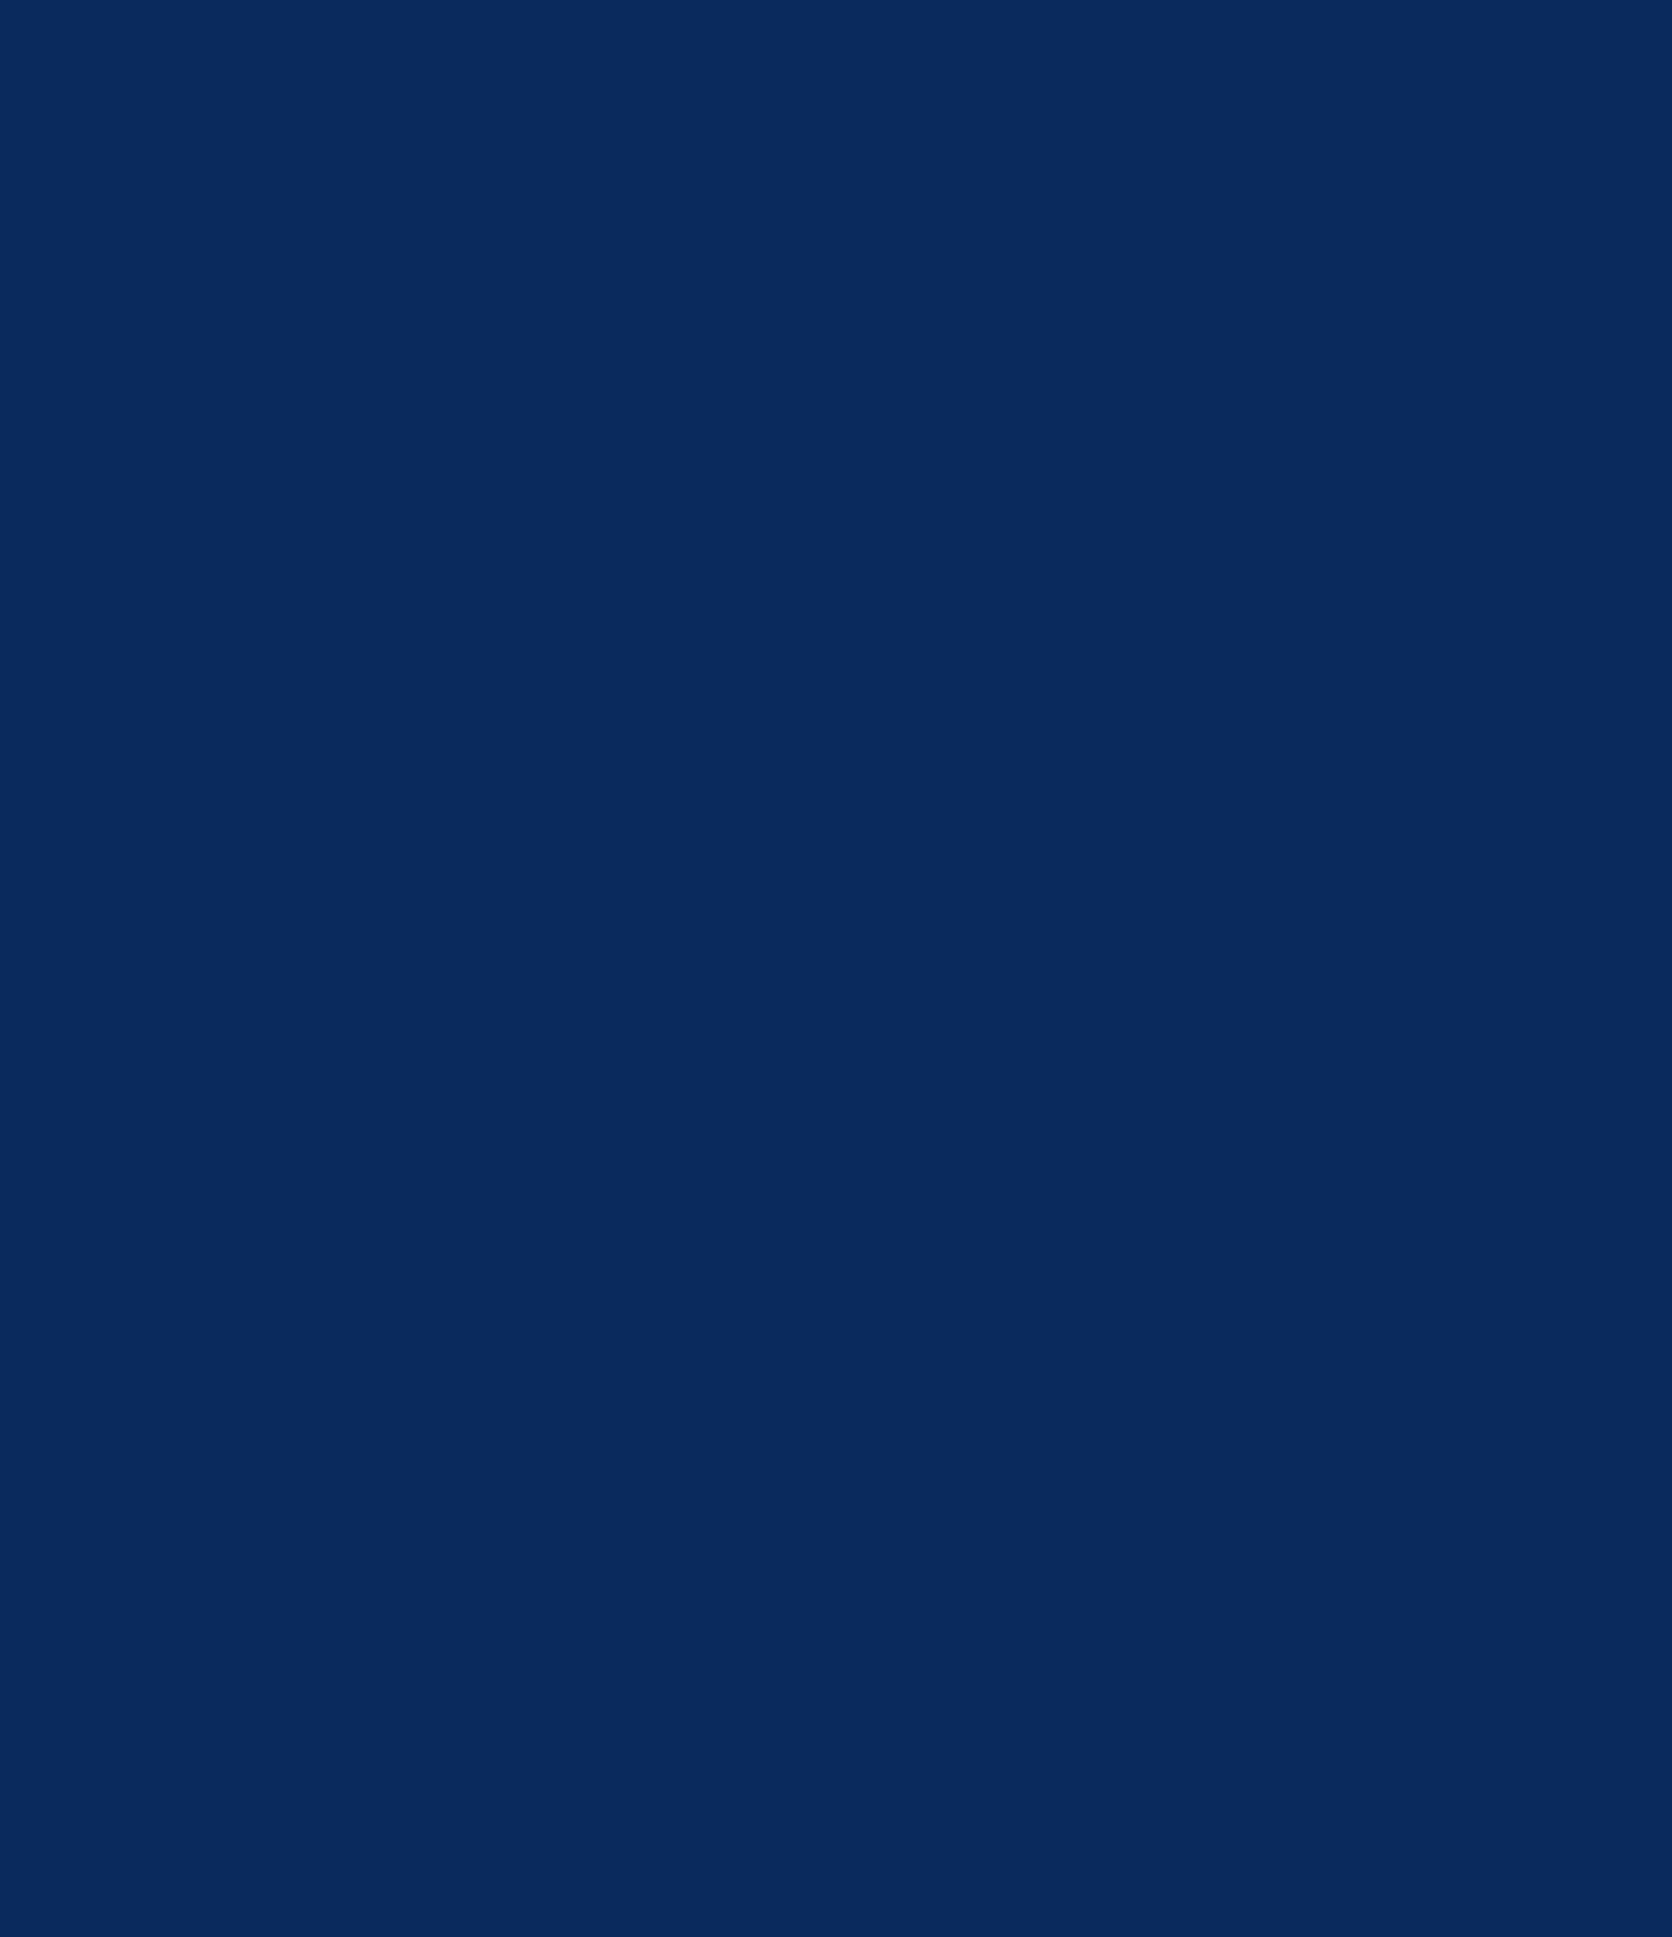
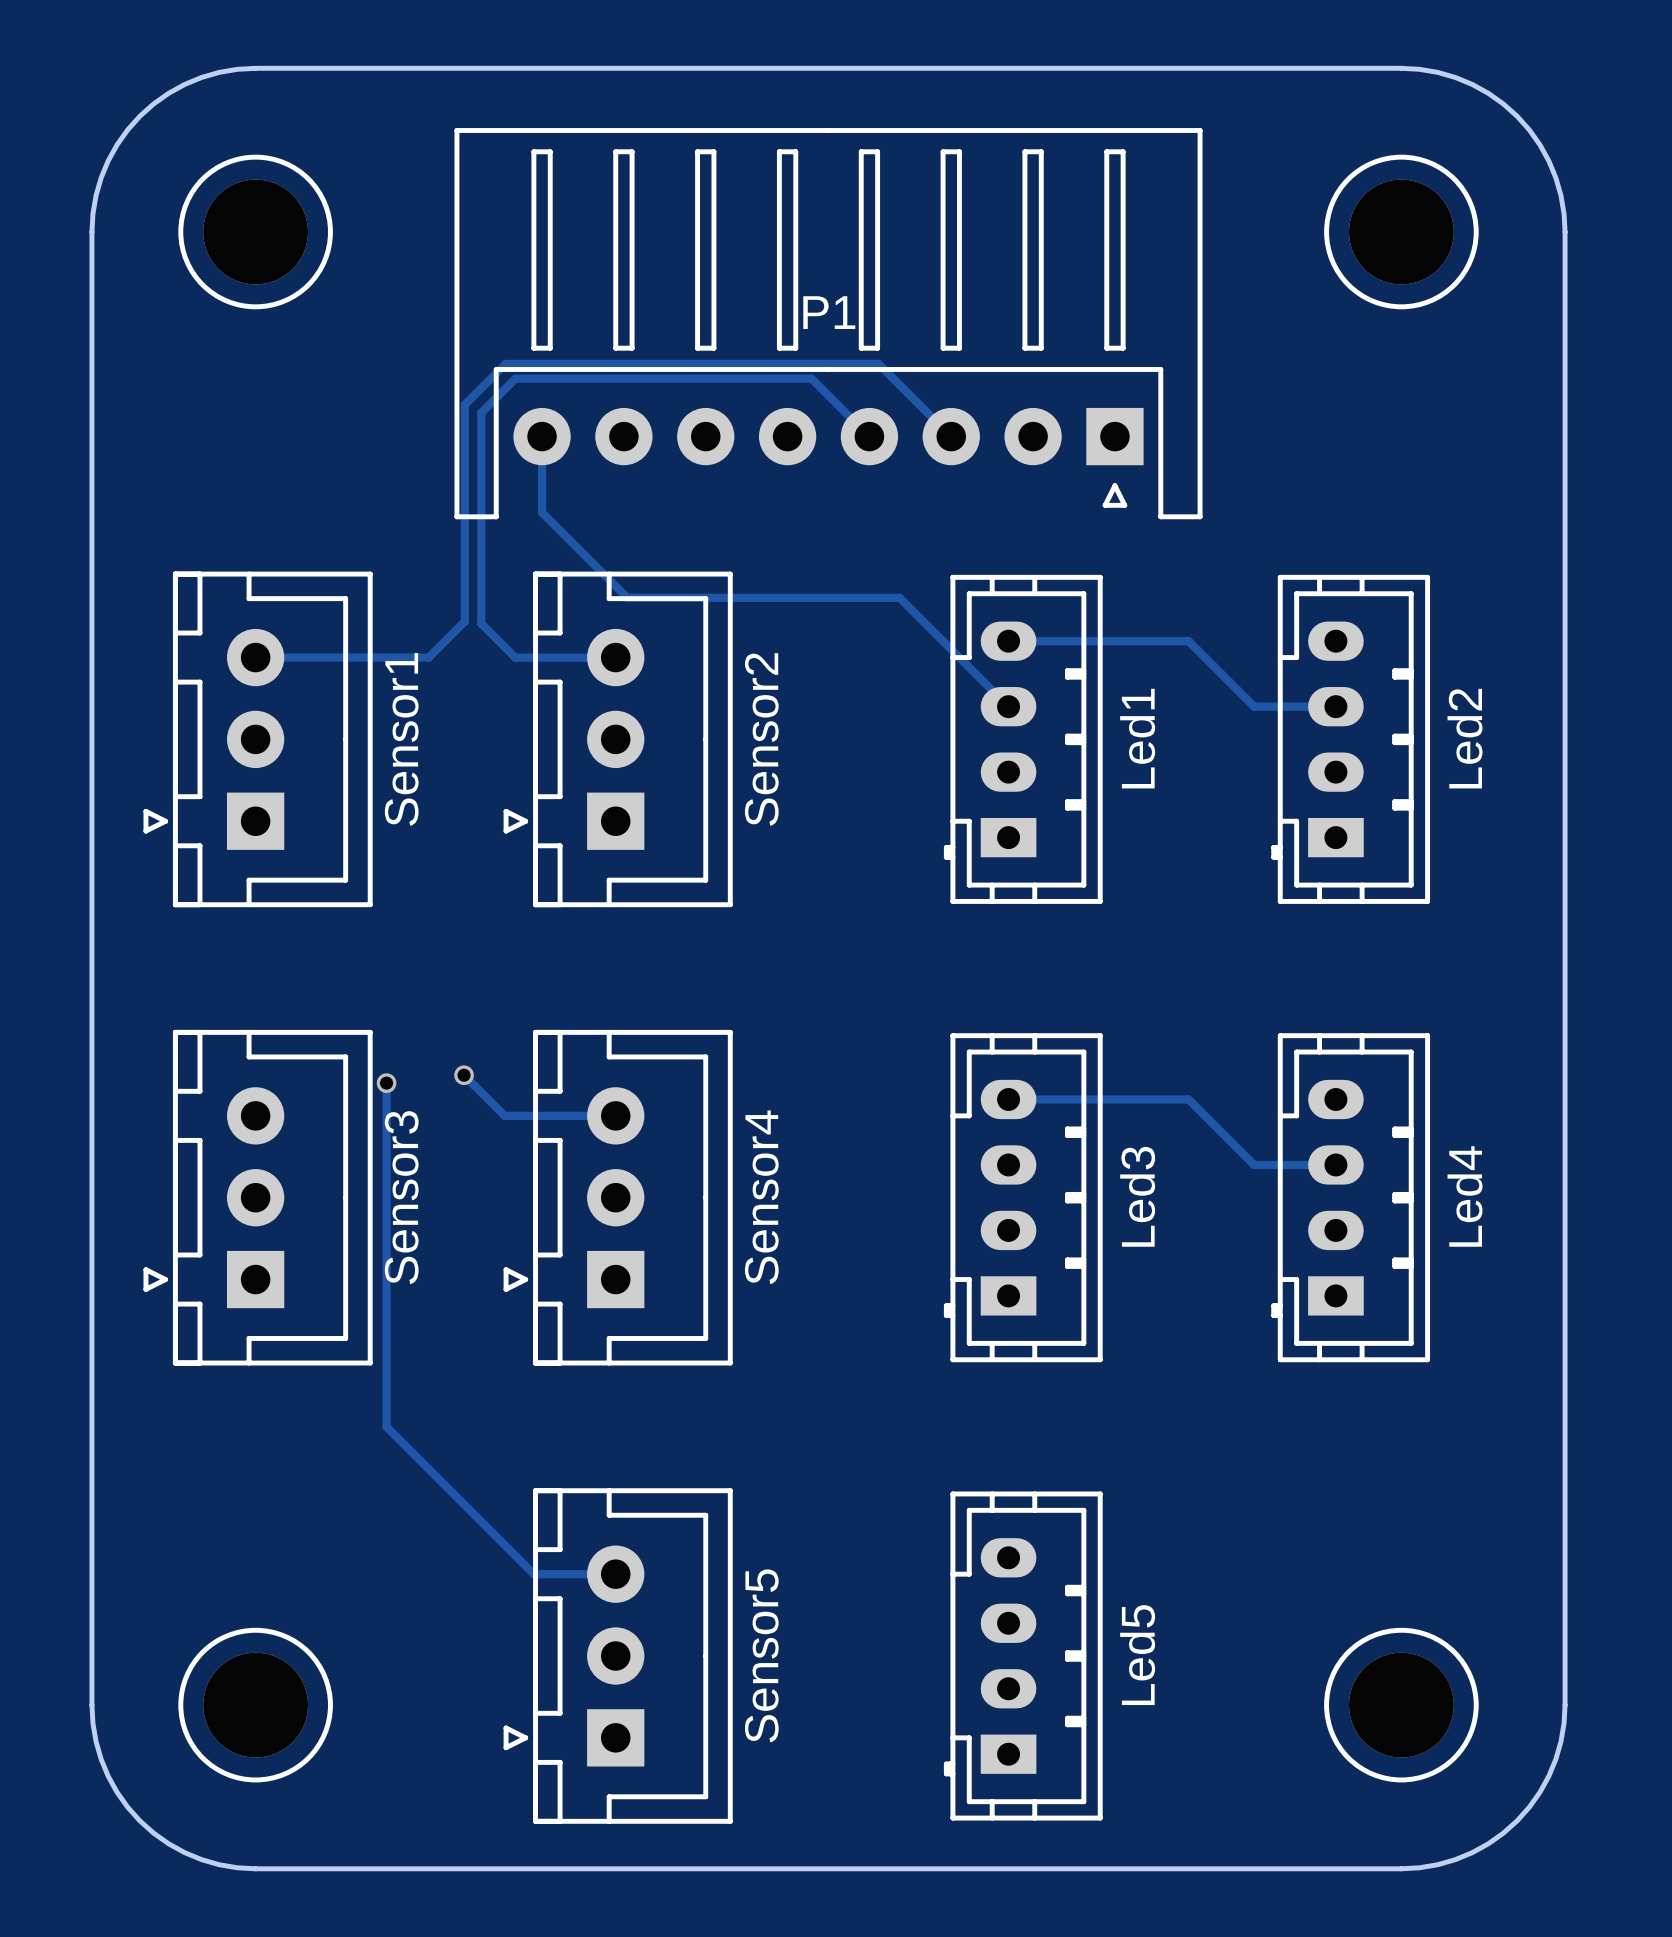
board edge: none -> (255, 68) (1419, 69) (1455, 77) (1488, 93) (1517, 116) (1539, 144) (1555, 177) (1560, 195) (1565, 231) (1565, 1705) (1560, 1741) (1555, 1759) (1539, 1792) (1517, 1820) (1488, 1843) (1455, 1859) (1437, 1864) (1401, 1868) (255, 1868) (219, 1864) (201, 1859) (168, 1843) (139, 1820) (117, 1792) (108, 1776) (96, 1741) (91, 1705) (92, 213) (96, 195) (108, 160) (127, 129) (139, 116) (168, 93) (184, 84) (219, 72) (255, 68)
part: none -> (255, 231)
part: none -> (1401, 231)
P1: none -> (828, 323)
track: none -> (542, 436) (542, 512) (627, 597) (899, 597) (1008, 706)
track: none -> (869, 436) (811, 378) (515, 378) (481, 412) (481, 623) (515, 657) (615, 657)
track: none -> (951, 436) (878, 363) (505, 363) (464, 404) (464, 621) (428, 657) (255, 657)
track: none -> (1008, 641) (1188, 641) (1254, 706) (1335, 706)
part: none -> Sensor1 (258, 739)
part: none -> Sensor2 (618, 739)
part: none -> Led1 (1023, 739)
part: none -> Led2 (1350, 739)
track: none -> (464, 1075) (504, 1115) (615, 1115)
via: none -> (464, 1075)
track: none -> (386, 1083) (386, 1426) (533, 1574) (615, 1574)
via: none -> (386, 1083)
track: none -> (1008, 1099) (1188, 1099) (1254, 1164) (1335, 1164)
part: none -> Sensor3 (258, 1197)
part: none -> Sensor4 (618, 1197)
part: none -> Led3 (1023, 1197)
part: none -> Led4 (1350, 1197)
part: none -> Sensor5 (618, 1656)
part: none -> Led5 (1023, 1656)
part: none -> (255, 1705)
part: none -> (1401, 1705)

